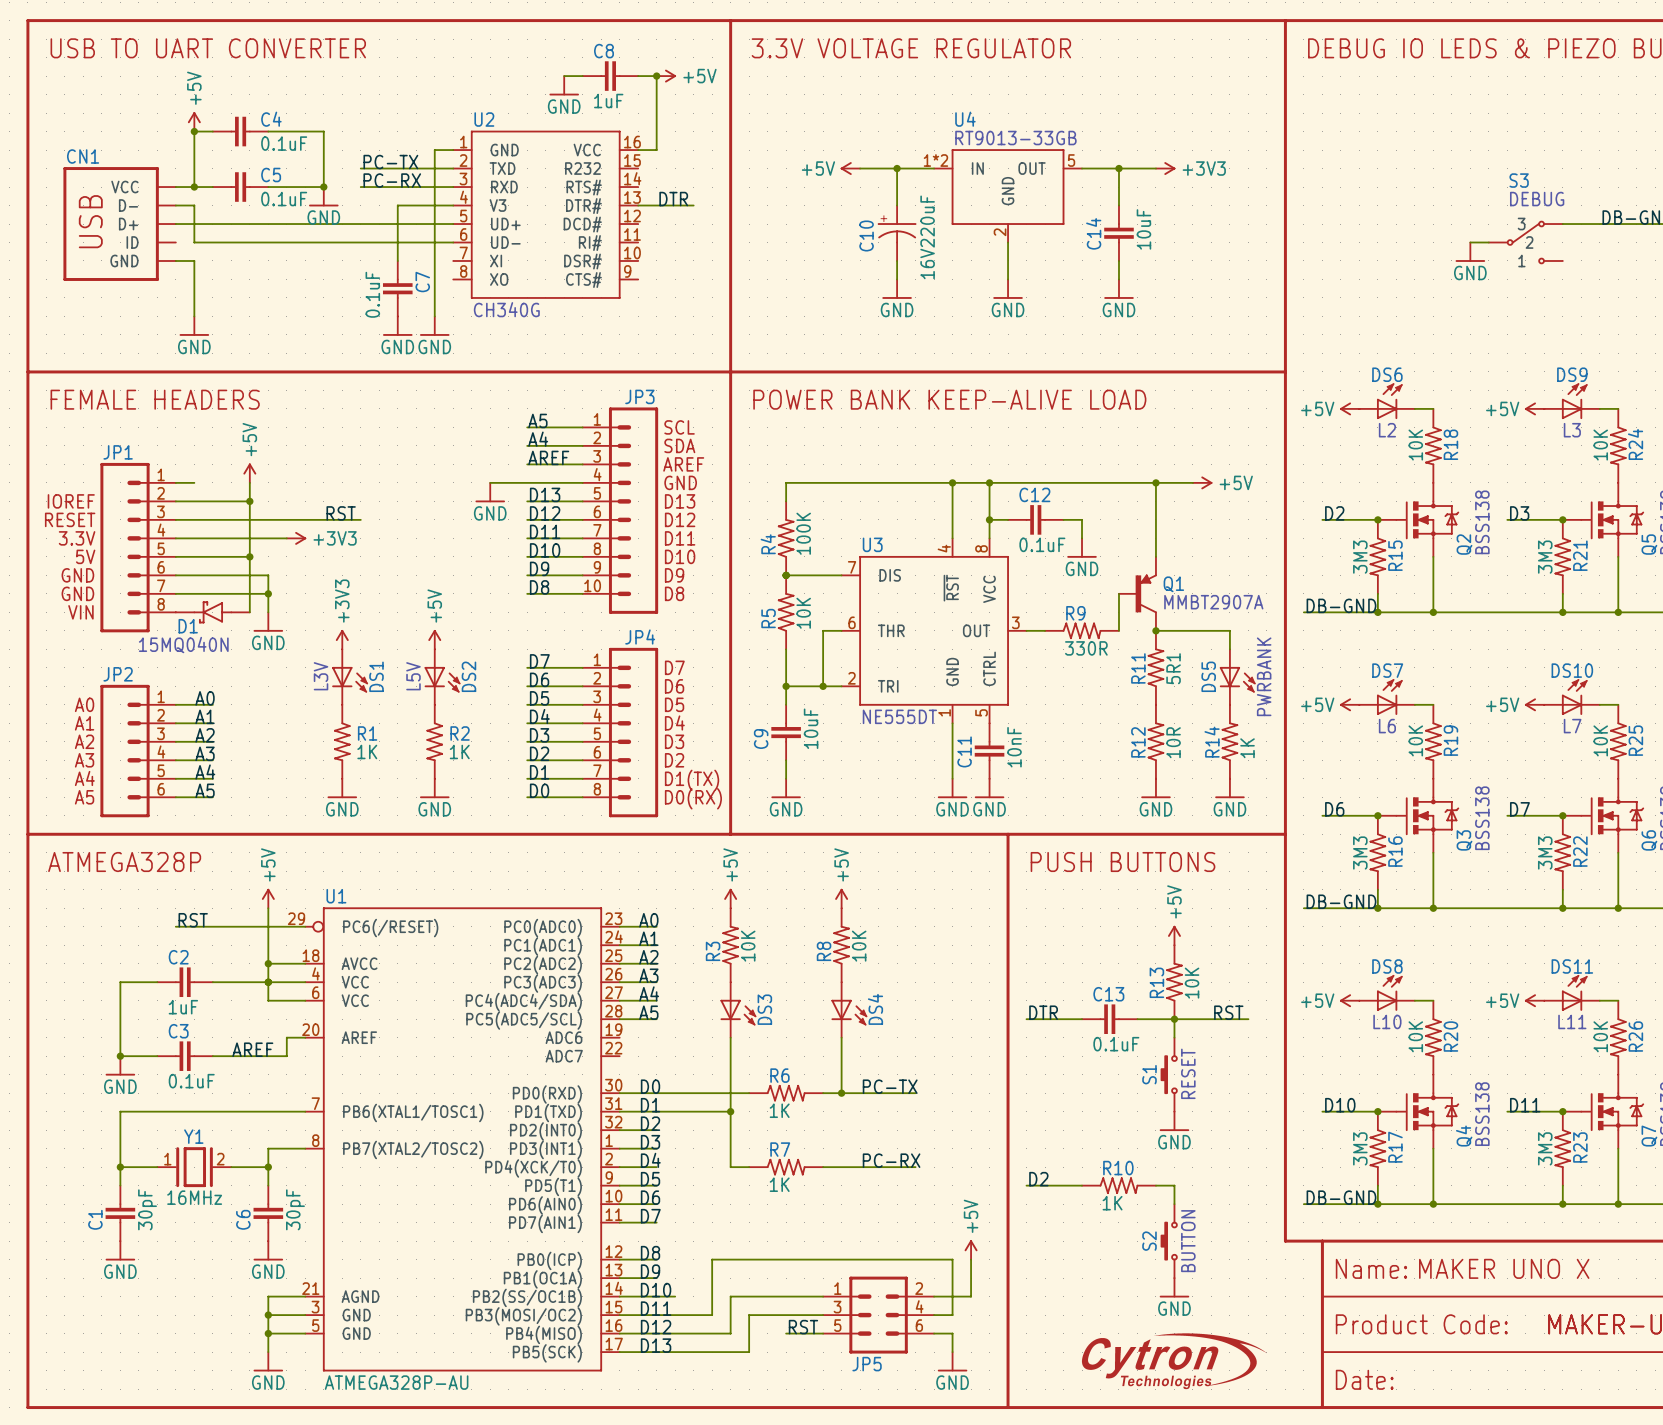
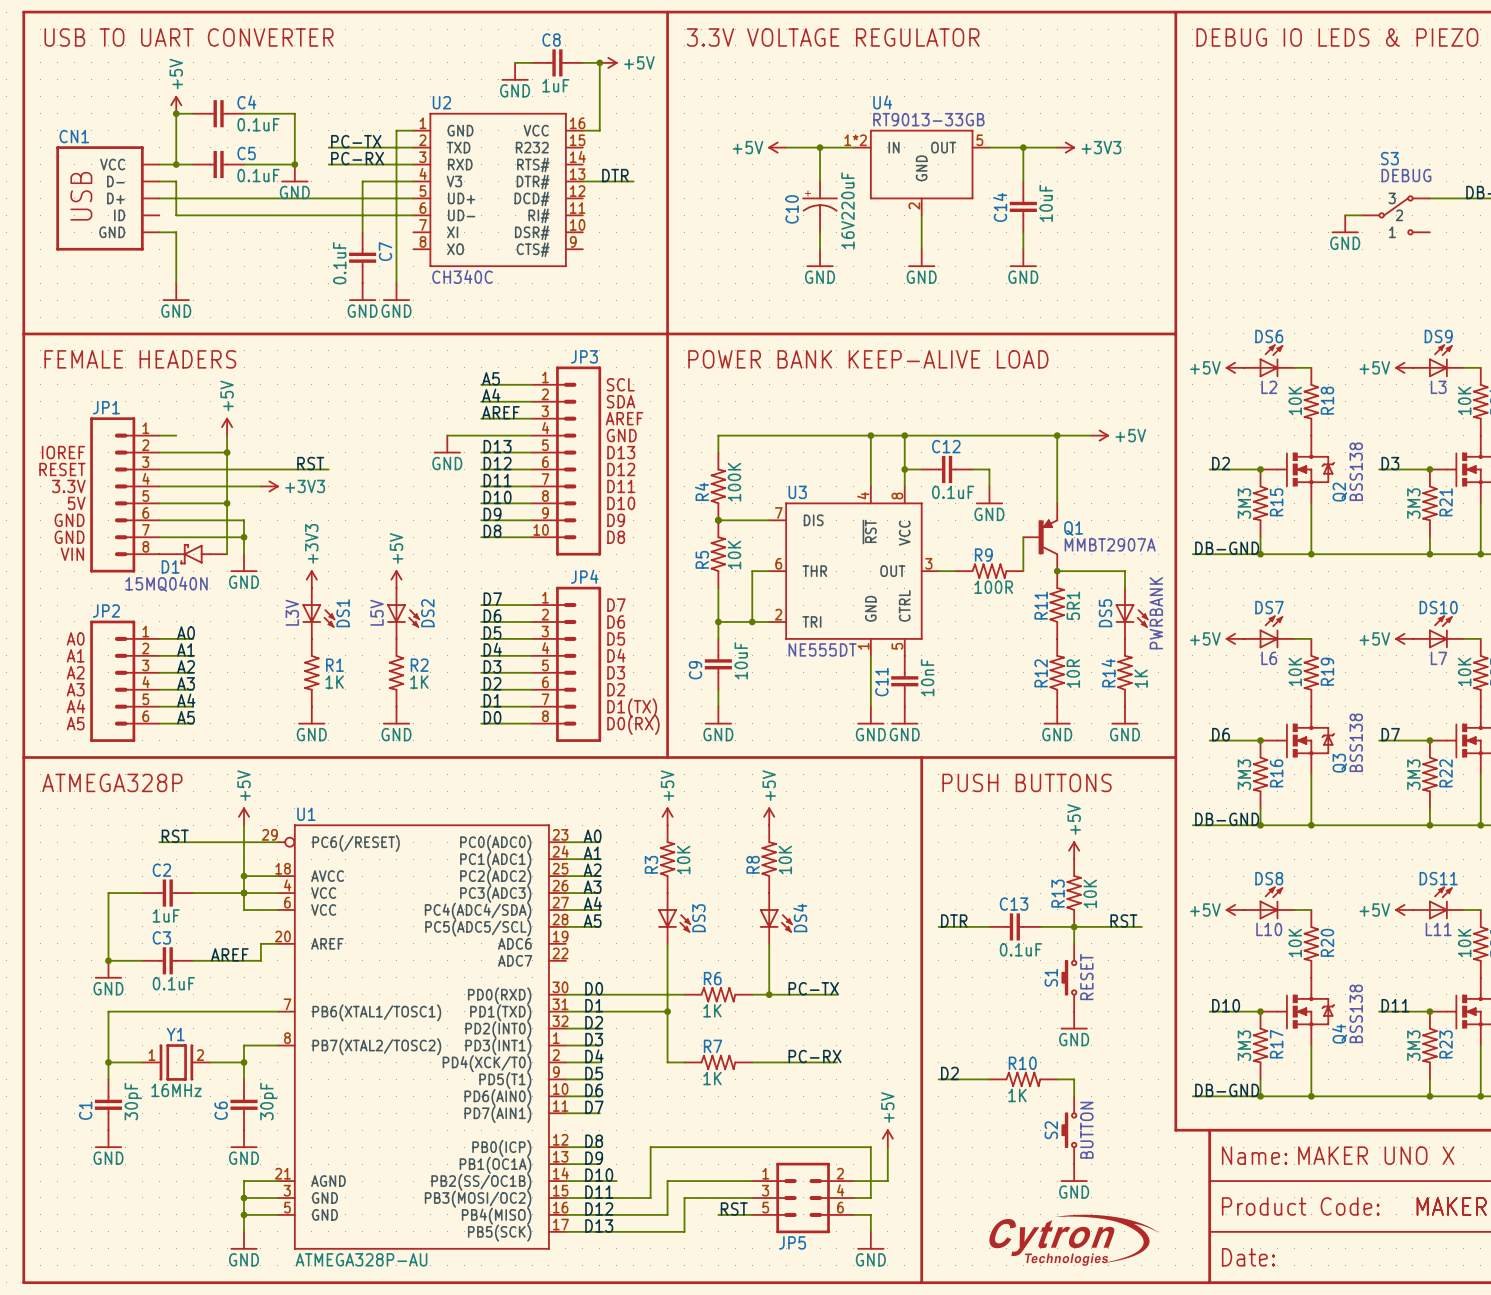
U2 text: CH340G (506, 309) -> CH340C (462, 276)
R9 value: 330R (1086, 648) -> 100R (993, 587)

